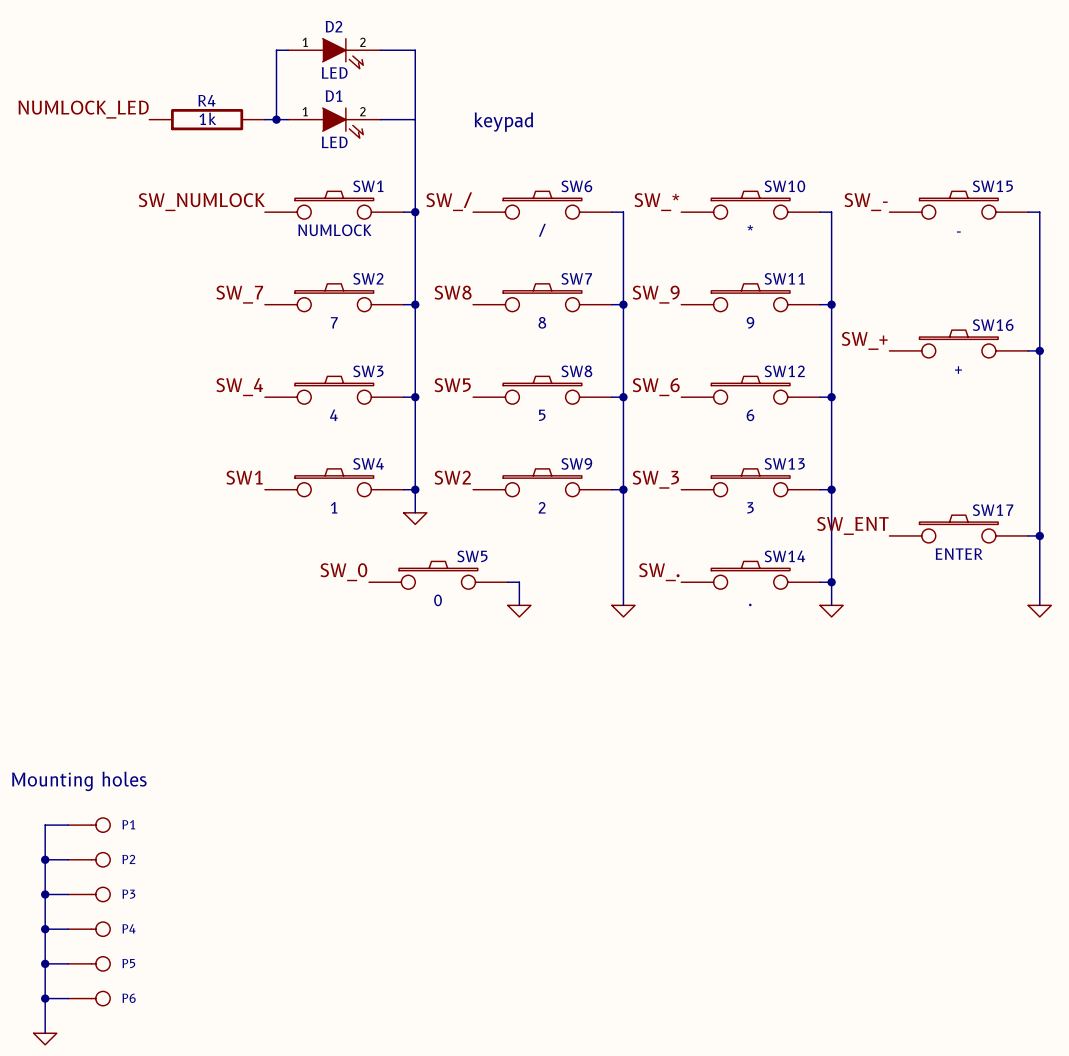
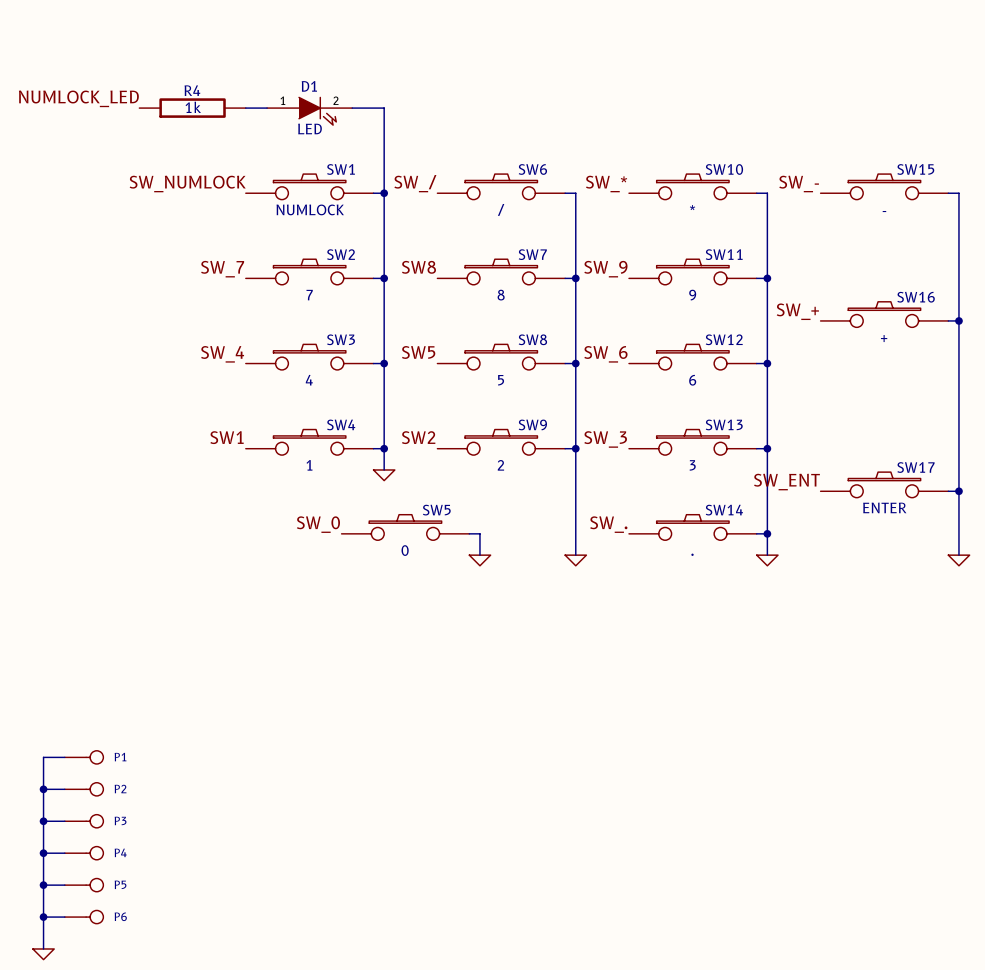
wire: (288, 50) (276, 50) (276, 119) -> none
wire: (380, 50) (415, 50) (415, 119) -> none
D2: LED (334, 53) -> none
junction: (276, 119) -> none
text: keypad (503, 122) -> none
text: Mounting holes (79, 781) -> none

